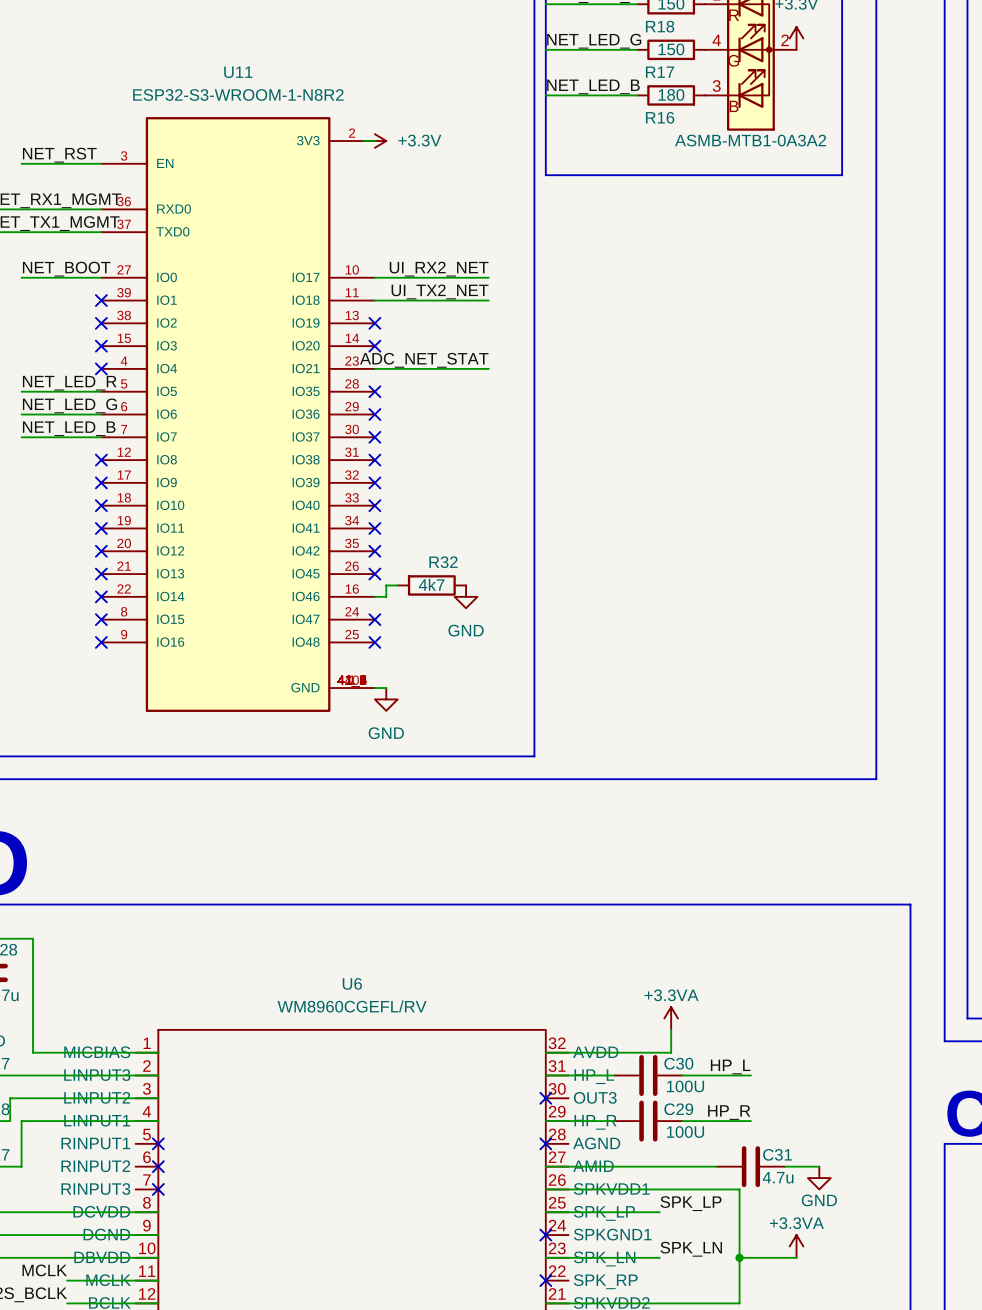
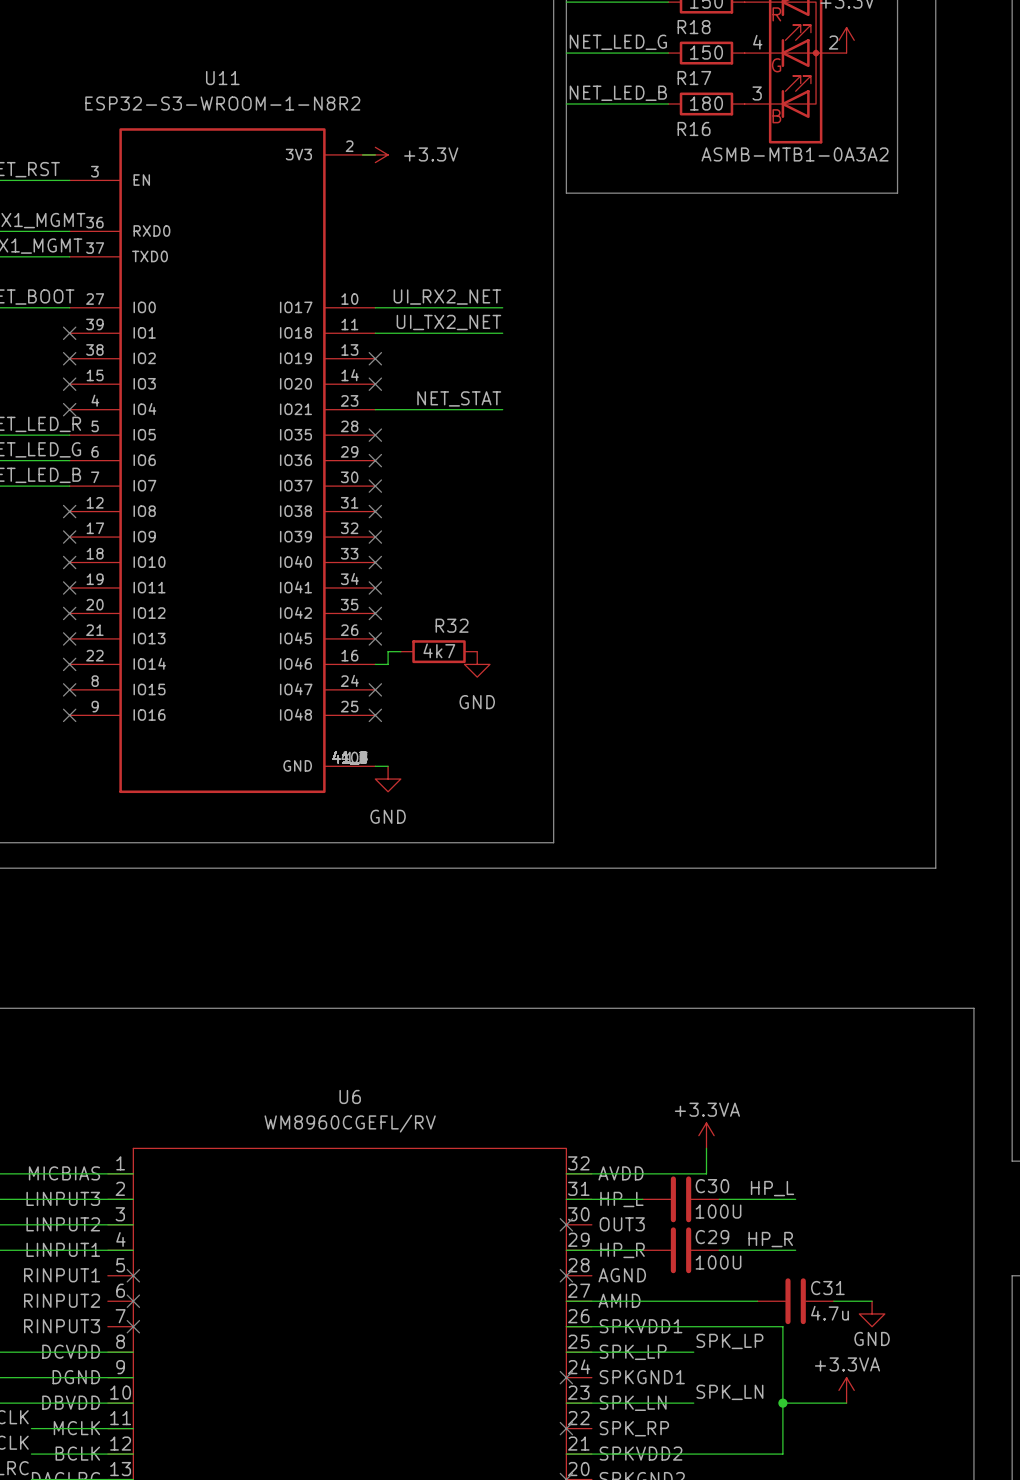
label: ADC_NET_STAT (424, 360) -> NET_STAT (459, 398)

